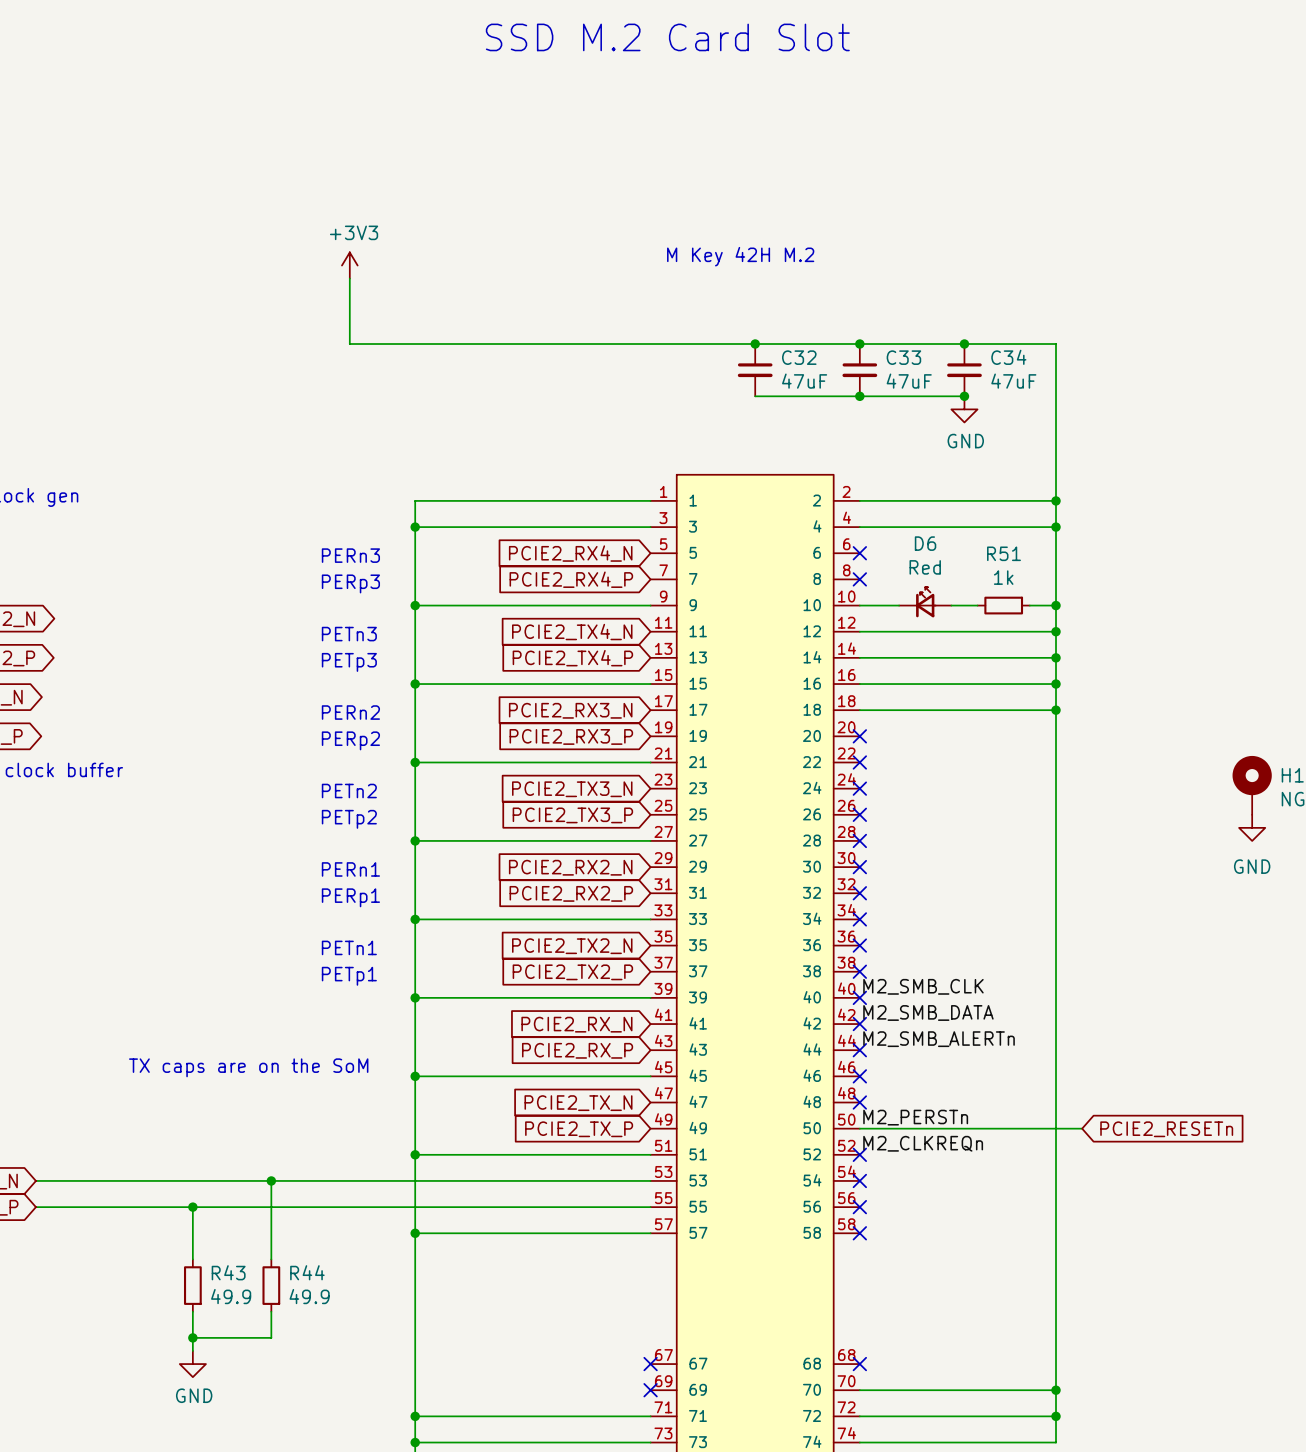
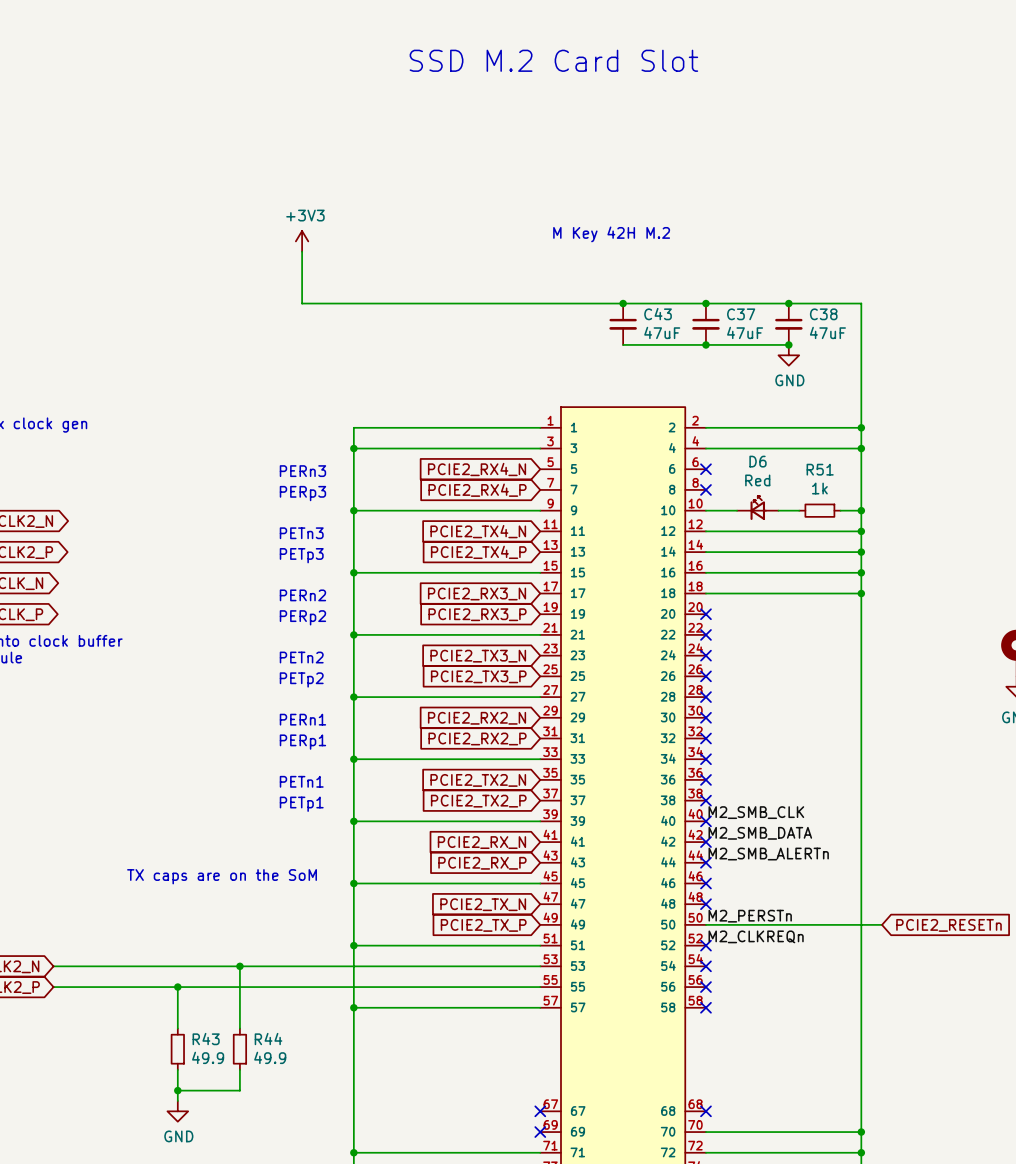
C32 name: C32 (799, 357) -> C43 (658, 314)
C33 name: C33 (903, 357) -> C37 (741, 314)
C34 name: C34 (1008, 357) -> C38 (823, 314)

